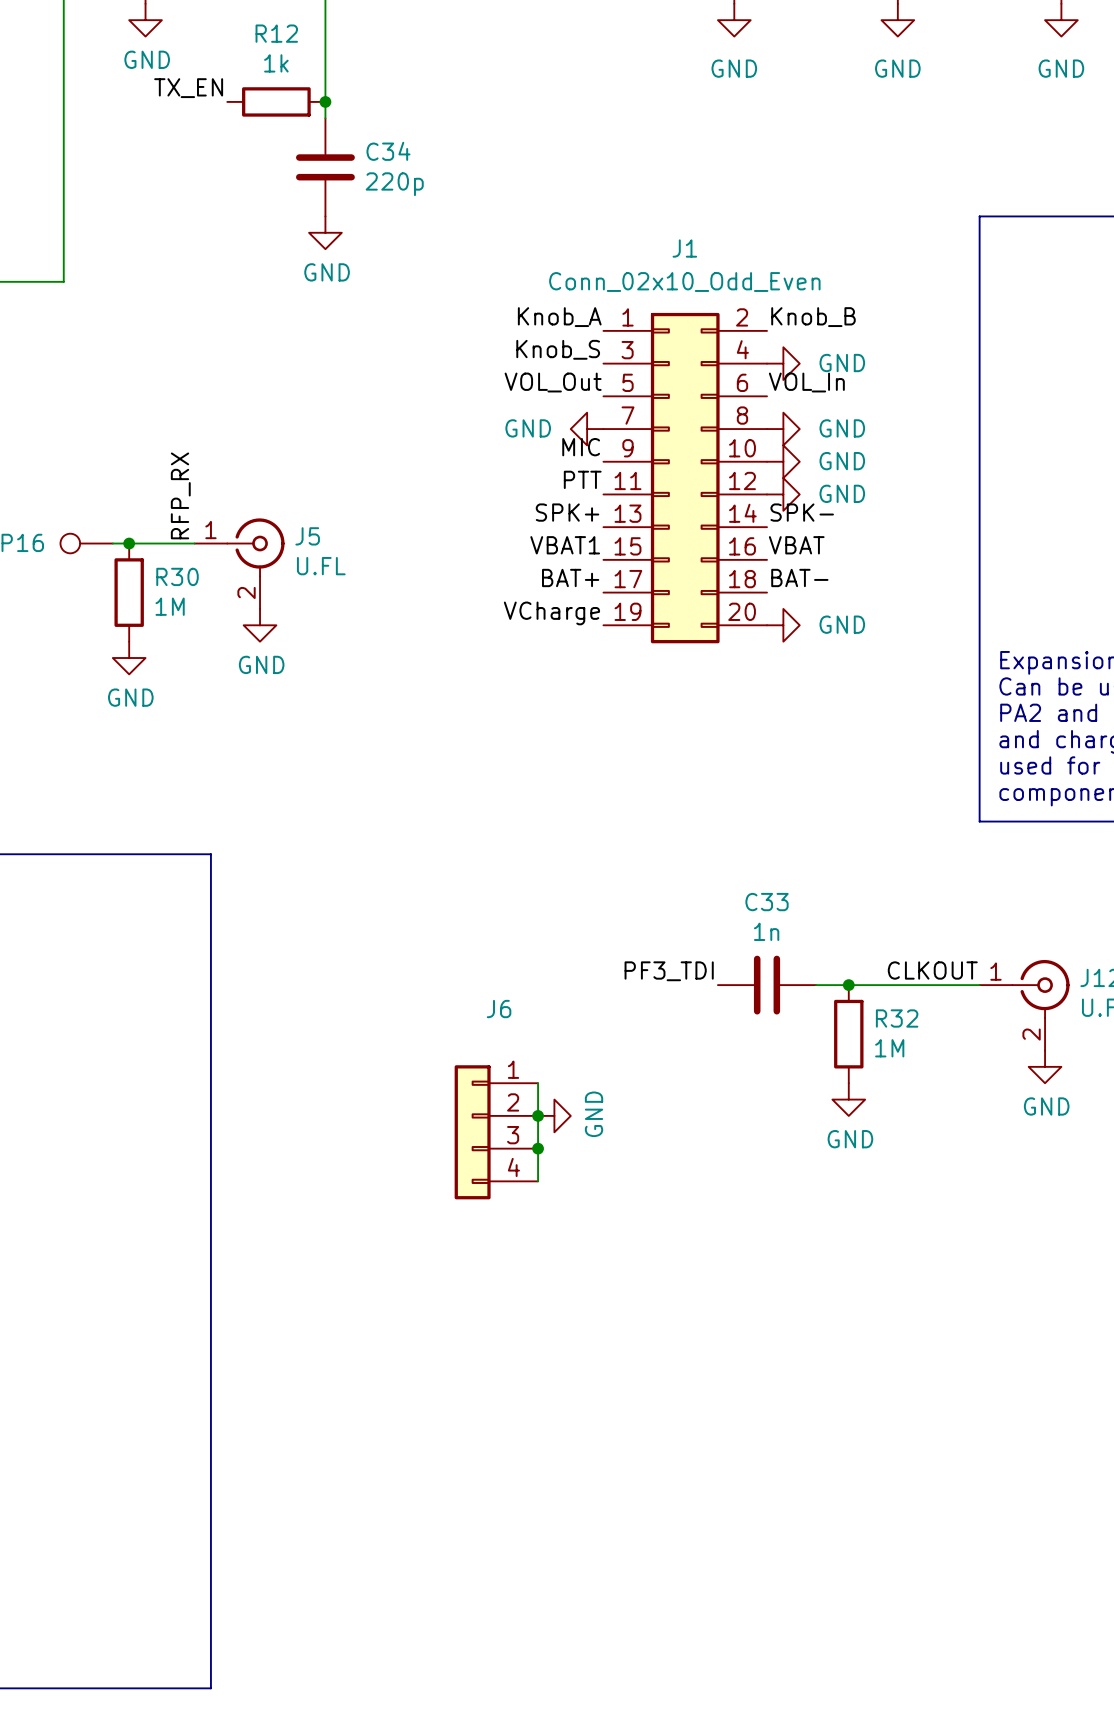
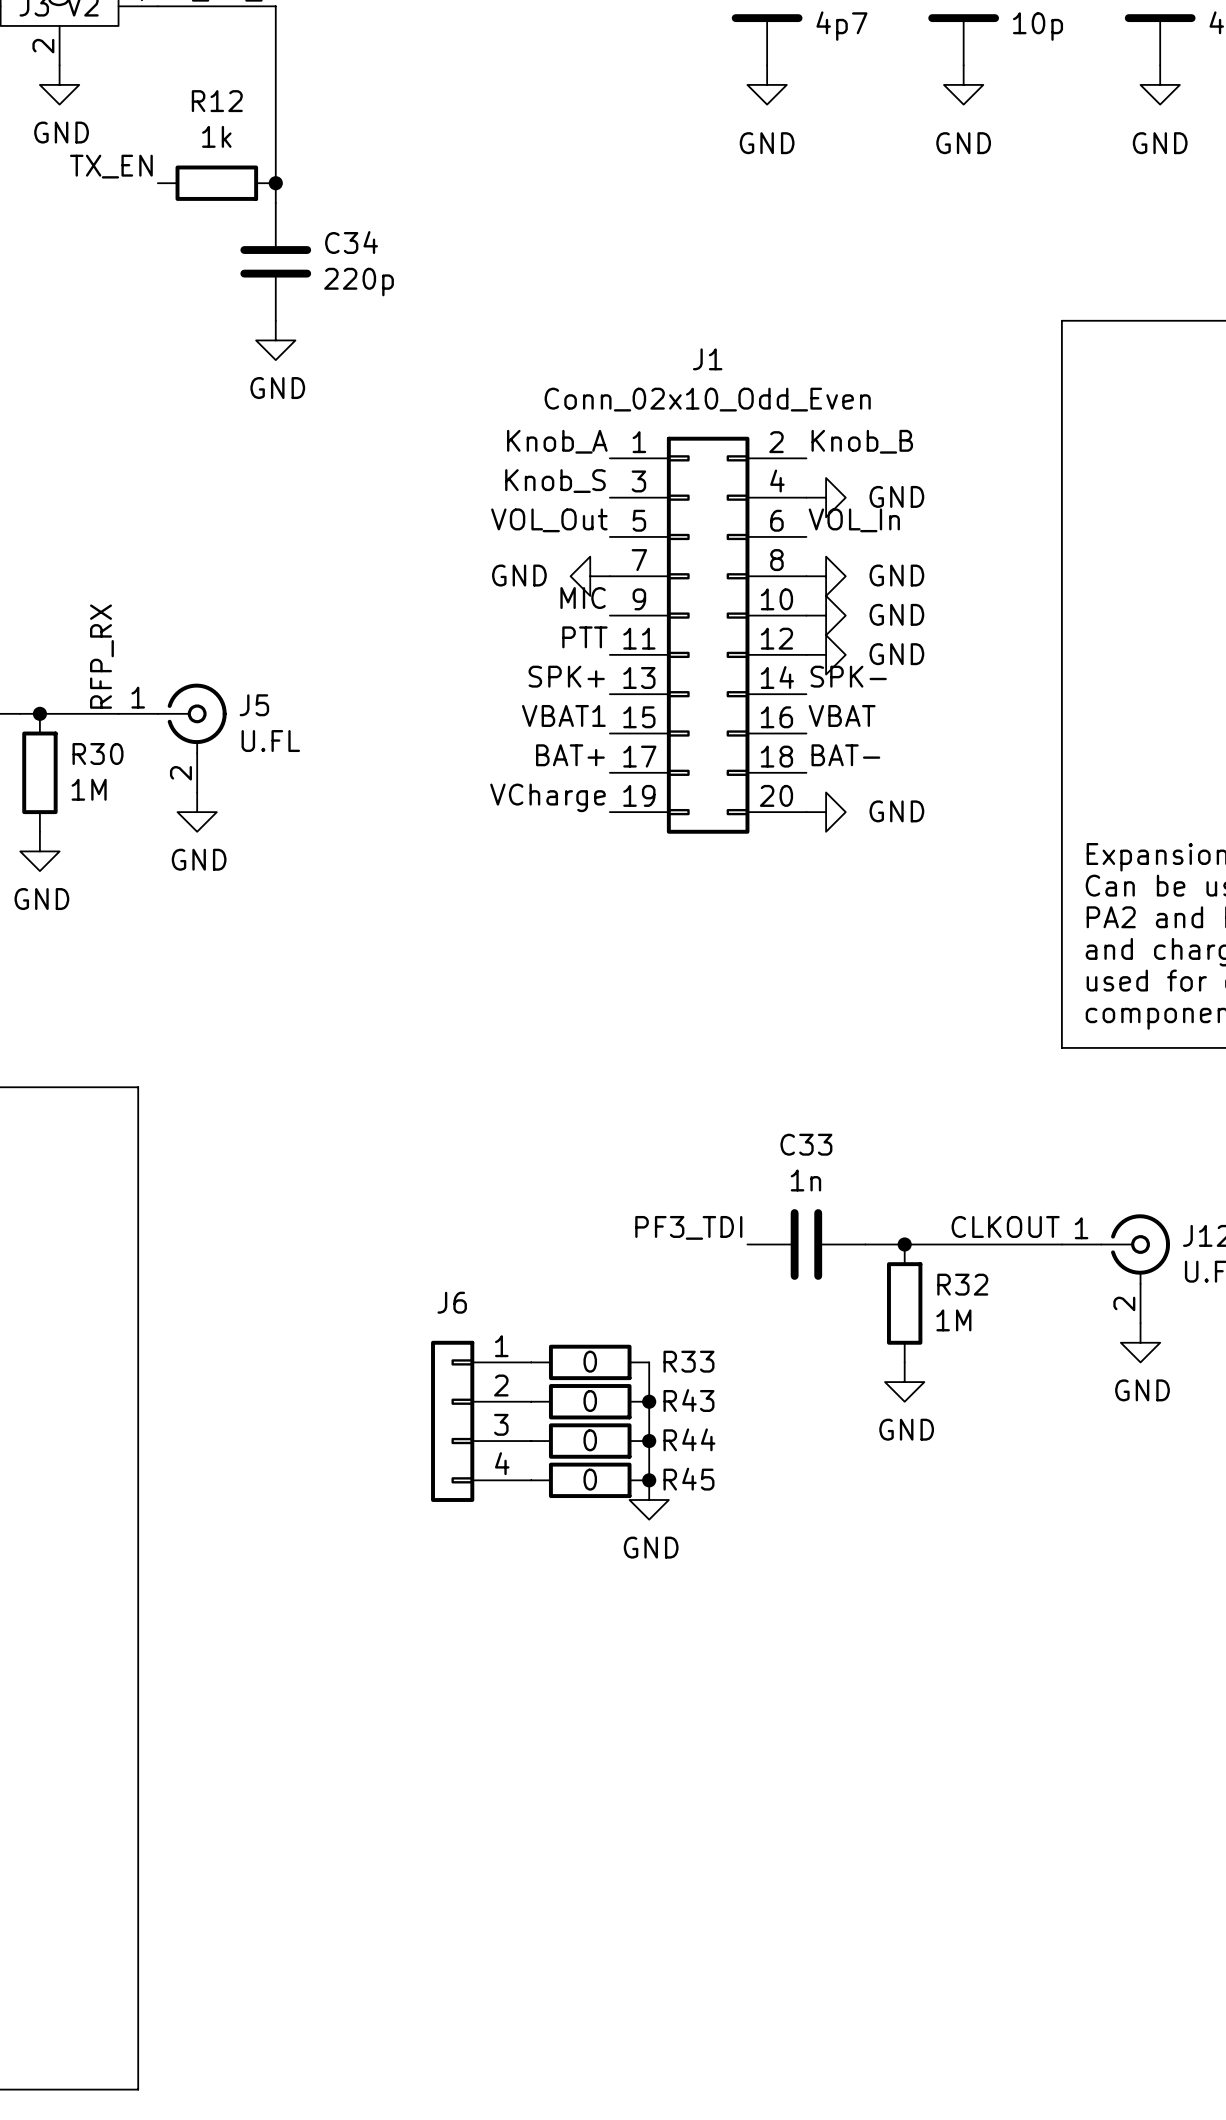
J6 name position: J6 (499, 1009) -> J6 (452, 1302)
wire: (538, 1083) (538, 1181) -> (649, 1362) (649, 1480)
R33: none -> 0 (590, 1362)
junction: (538, 1115) -> none
power symbol rotation: 0° (554, 1115) -> 90° clockwise (649, 1499)
power symbol position: GND (554, 1115) -> GND (649, 1499)
R43: none -> 0 (590, 1401)
junction: none -> (649, 1401)
junction: (538, 1148) -> none
R44: none -> 0 (590, 1441)
junction: none -> (649, 1441)
R45: none -> 0 (590, 1480)
junction: none -> (649, 1480)

